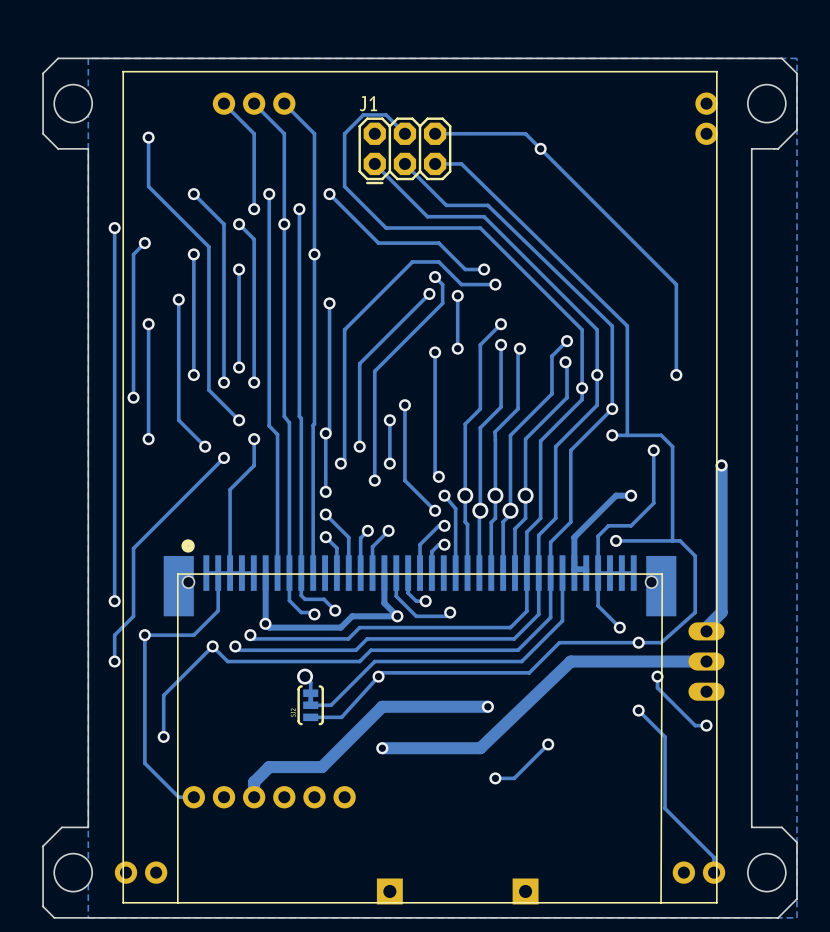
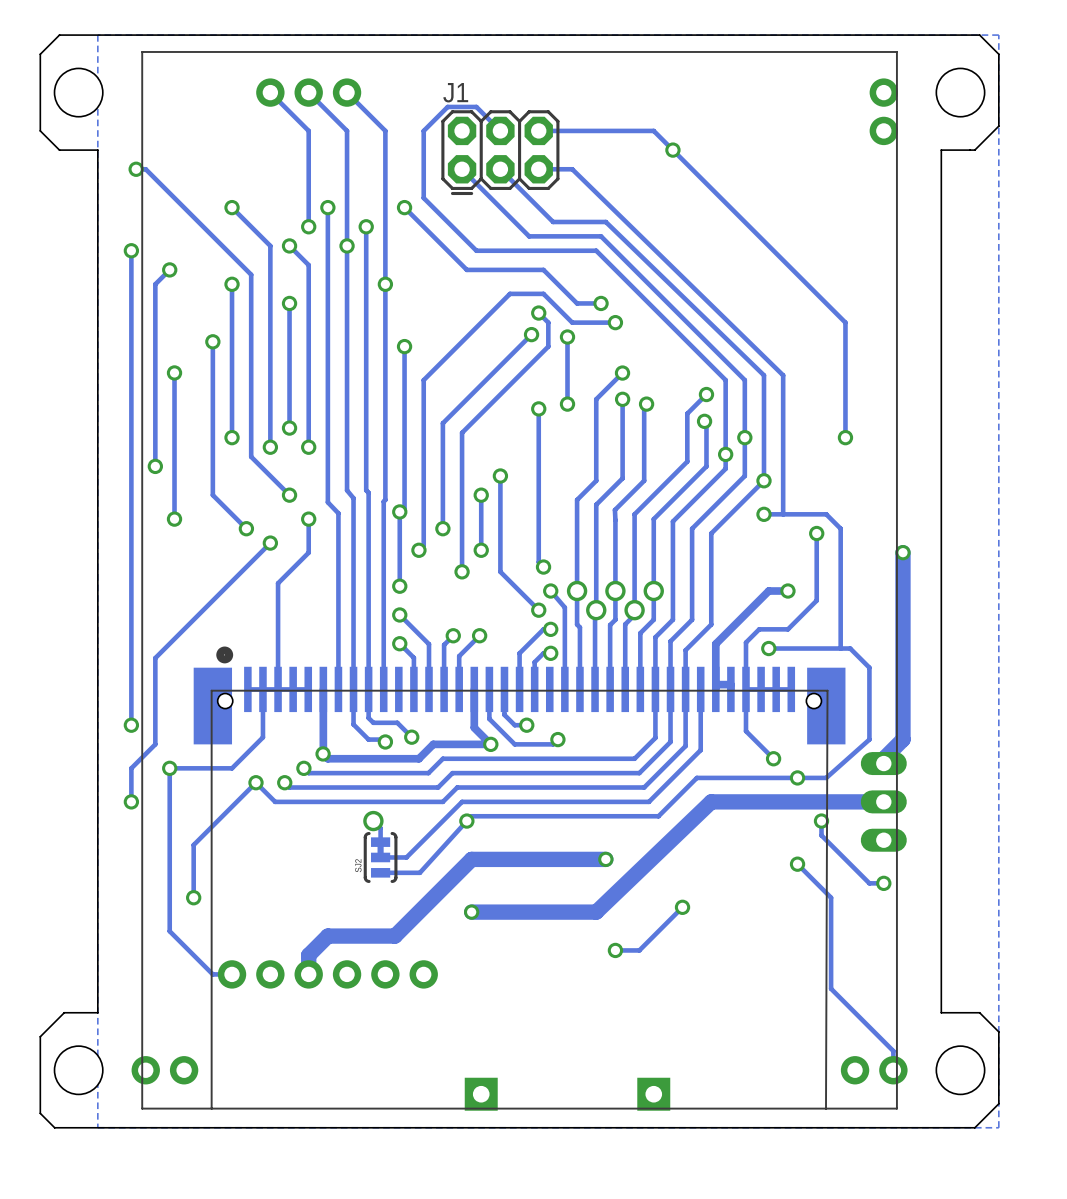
track: (148, 137) (148, 186) -> (136, 169) (145, 169) (174, 198)
via position: (148, 137) -> (136, 169)

